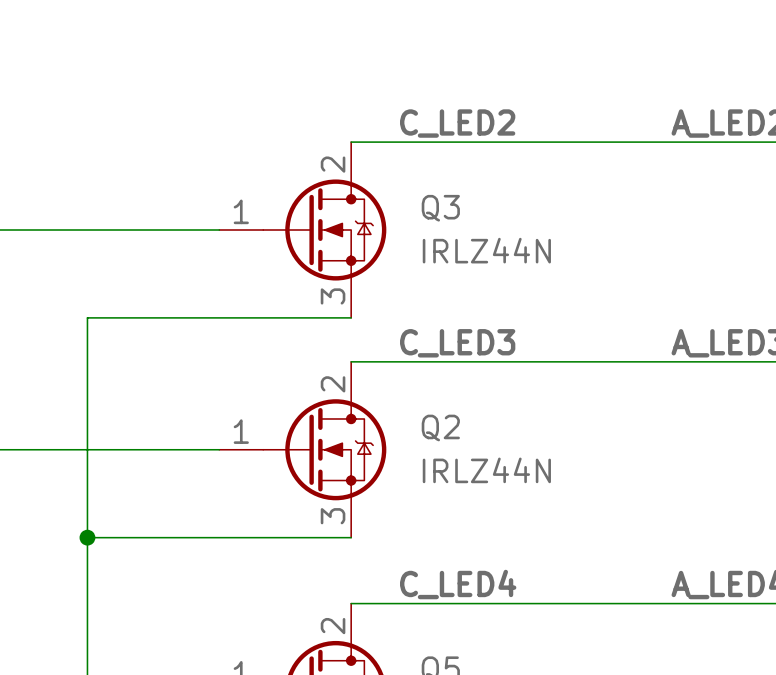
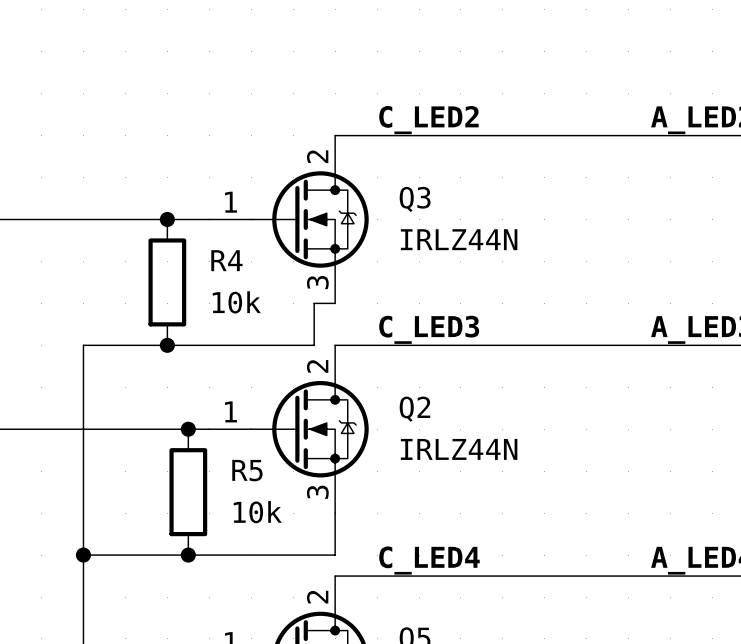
junction: none -> (167, 219)
R4: none -> 10k (167, 282)
wire: (329, 317) (87, 317) (87, 361) -> (314, 303) (314, 345) (83, 345)
junction: none -> (167, 345)
junction: none -> (188, 429)
R5: none -> 10k (188, 492)
wire: (87, 537) (351, 537) -> (83, 555) (335, 555) (335, 513)
junction position: (87, 537) -> (83, 555)
junction: none -> (188, 555)

